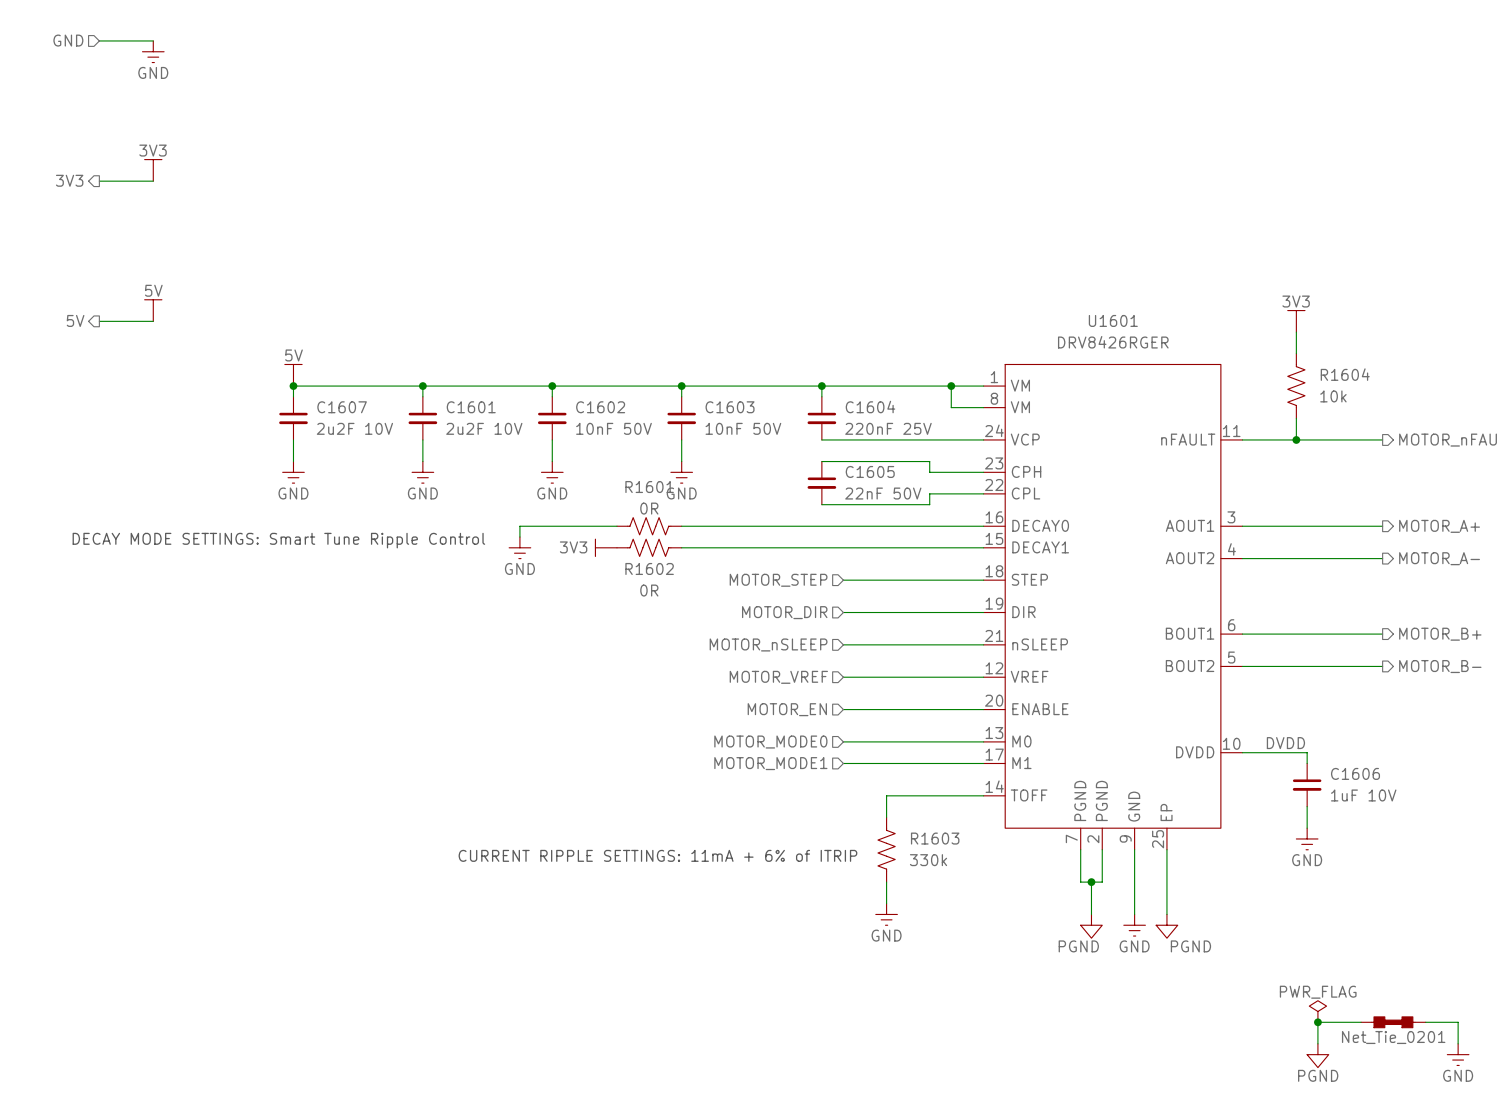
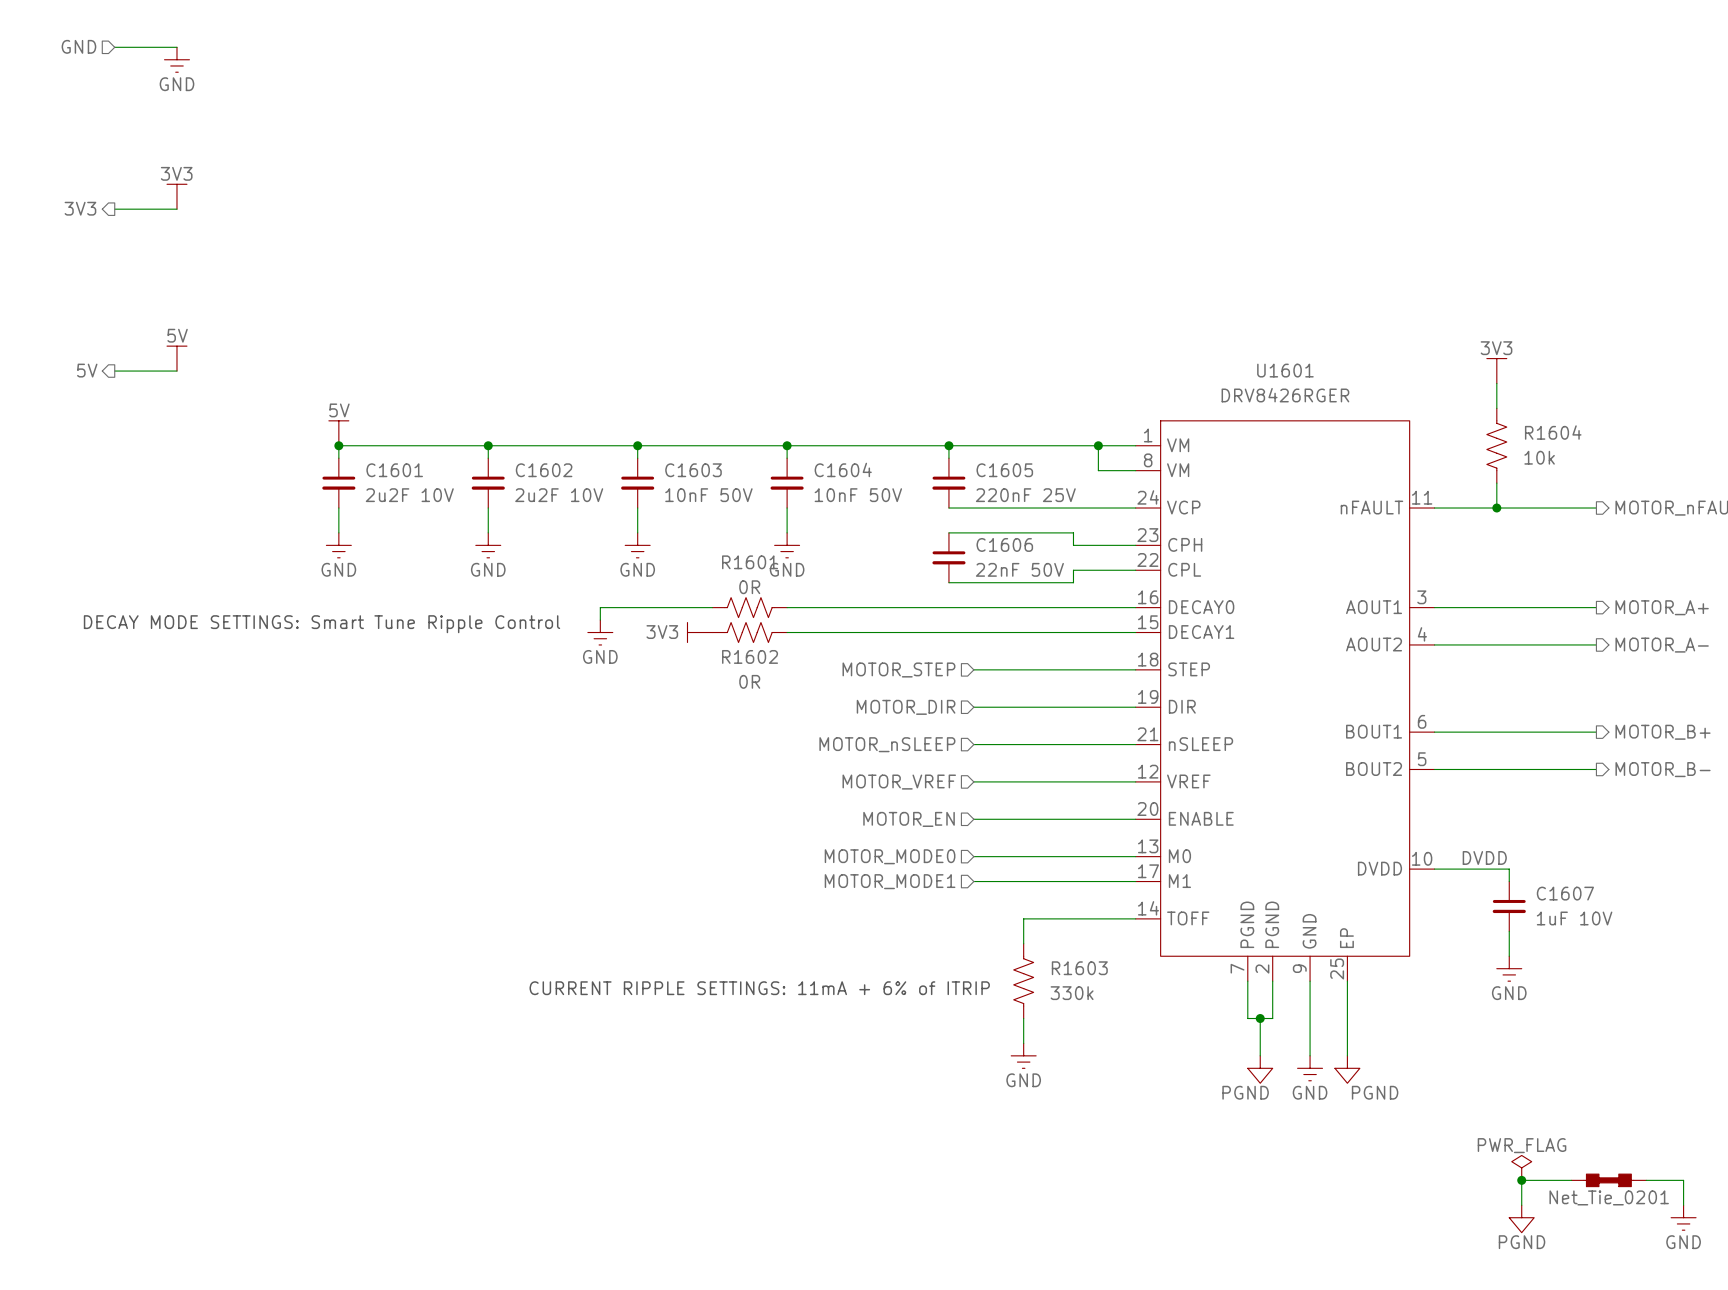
C1607 name: C1607 (342, 407) -> C1601 (394, 470)
C1601 name: C1601 (471, 407) -> C1602 (544, 470)
C1602 name: C1602 (600, 407) -> C1603 (693, 470)
C1603 name: C1603 (730, 407) -> C1604 (843, 469)
C1604 name: C1604 (870, 407) -> C1605 (1004, 470)
C1605 name: C1605 (870, 471) -> C1606 (1004, 544)
C1606 name: C1606 (1355, 773) -> C1607 (1565, 893)

